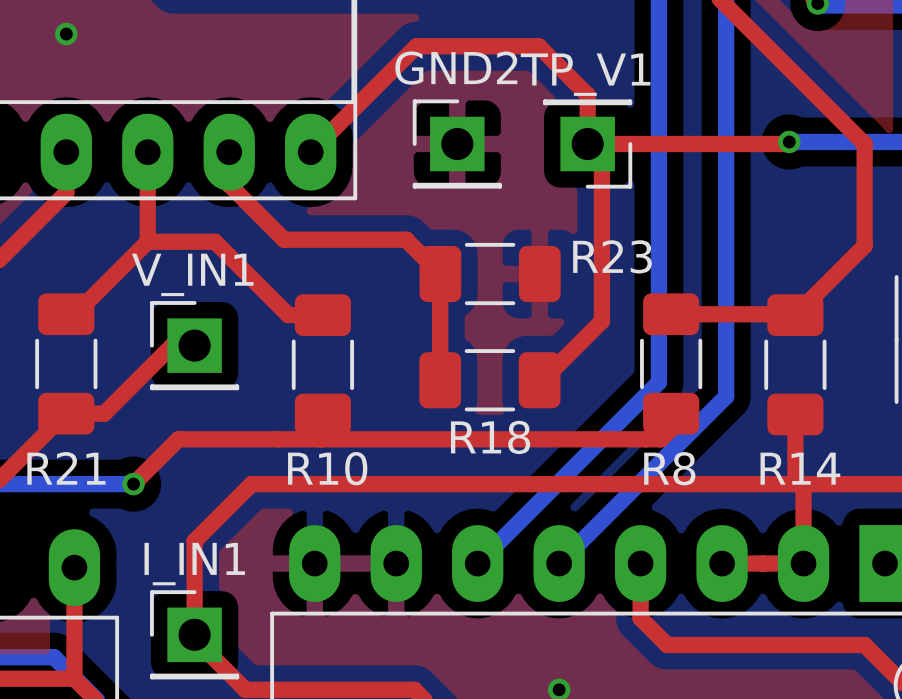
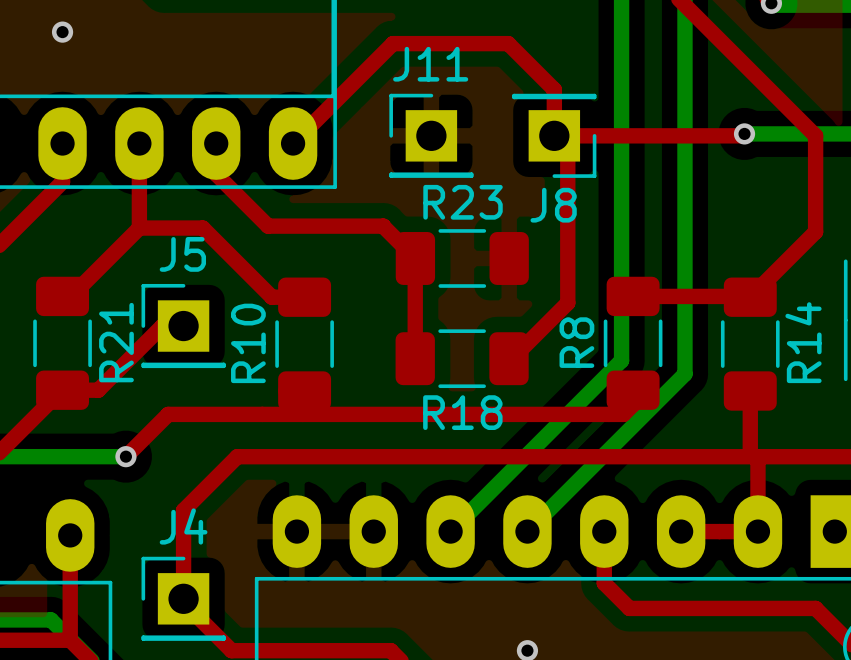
GND2 name: GND2 (456, 68) -> J11 (430, 64)
TP_V1 name: TP_V1 (585, 74) -> J8 (553, 205)
R23 name position: R23 (612, 256) -> R23 (463, 202)
V_IN1 name: V_IN1 (192, 274) -> J5 (182, 254)
R21 name rotation: 0° (66, 468) -> 90° counterclockwise (116, 342)
R21 name position: R21 (66, 468) -> R21 (116, 342)
R10 name rotation: 0° (327, 468) -> 90° counterclockwise (248, 343)
R10 name position: R10 (327, 468) -> R10 (248, 343)
R8 name rotation: 0° (669, 468) -> 90° counterclockwise (576, 342)
R8 name position: R8 (669, 468) -> R8 (576, 342)
R14 name rotation: 0° (800, 468) -> 90° counterclockwise (803, 342)
R14 name position: R14 (800, 468) -> R14 (803, 342)
I_IN1 name: I_IN1 (194, 564) -> J4 (183, 526)

